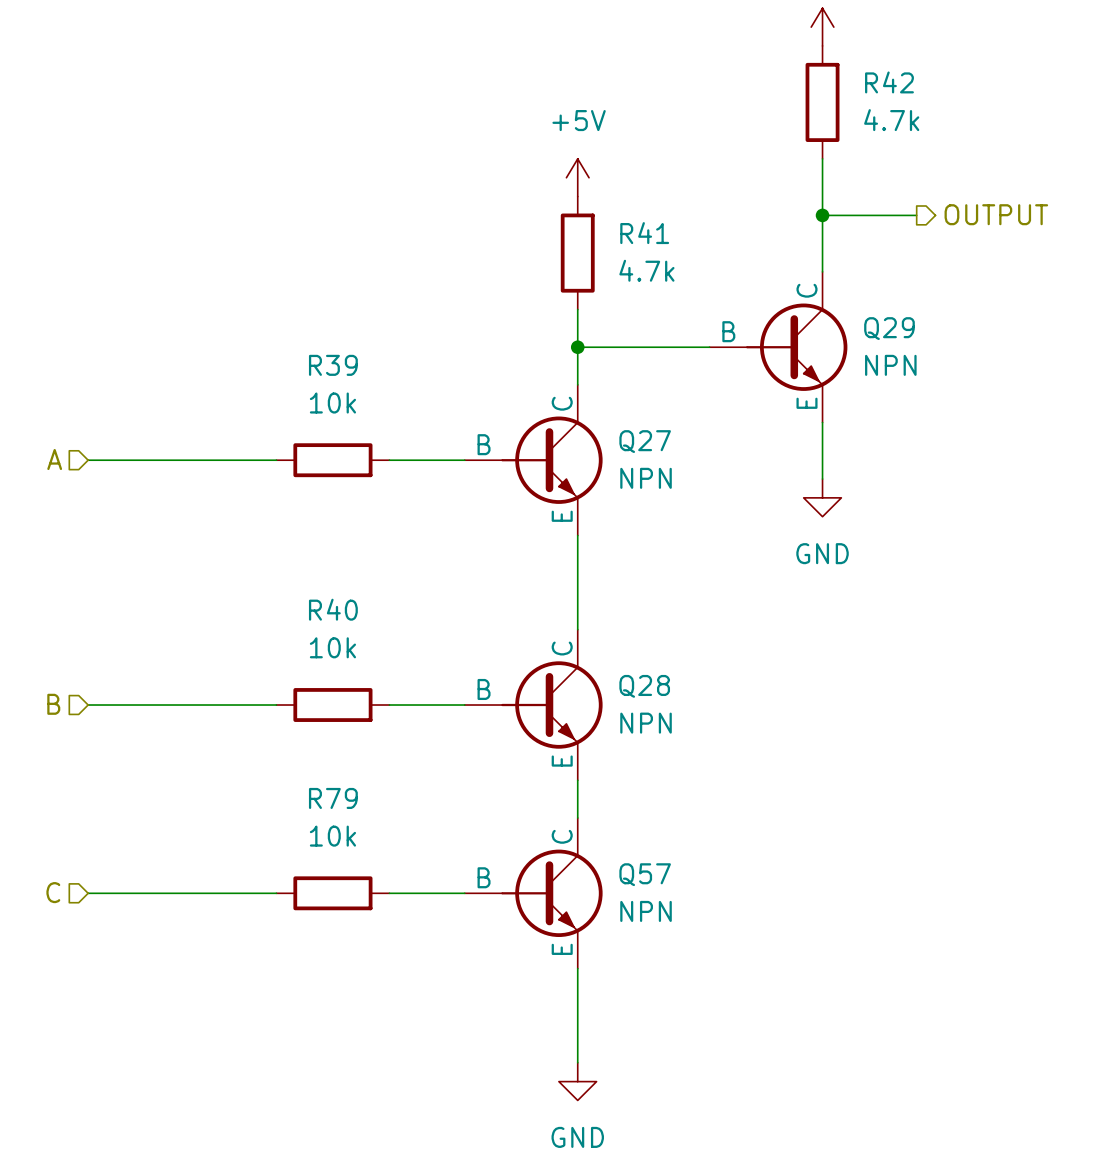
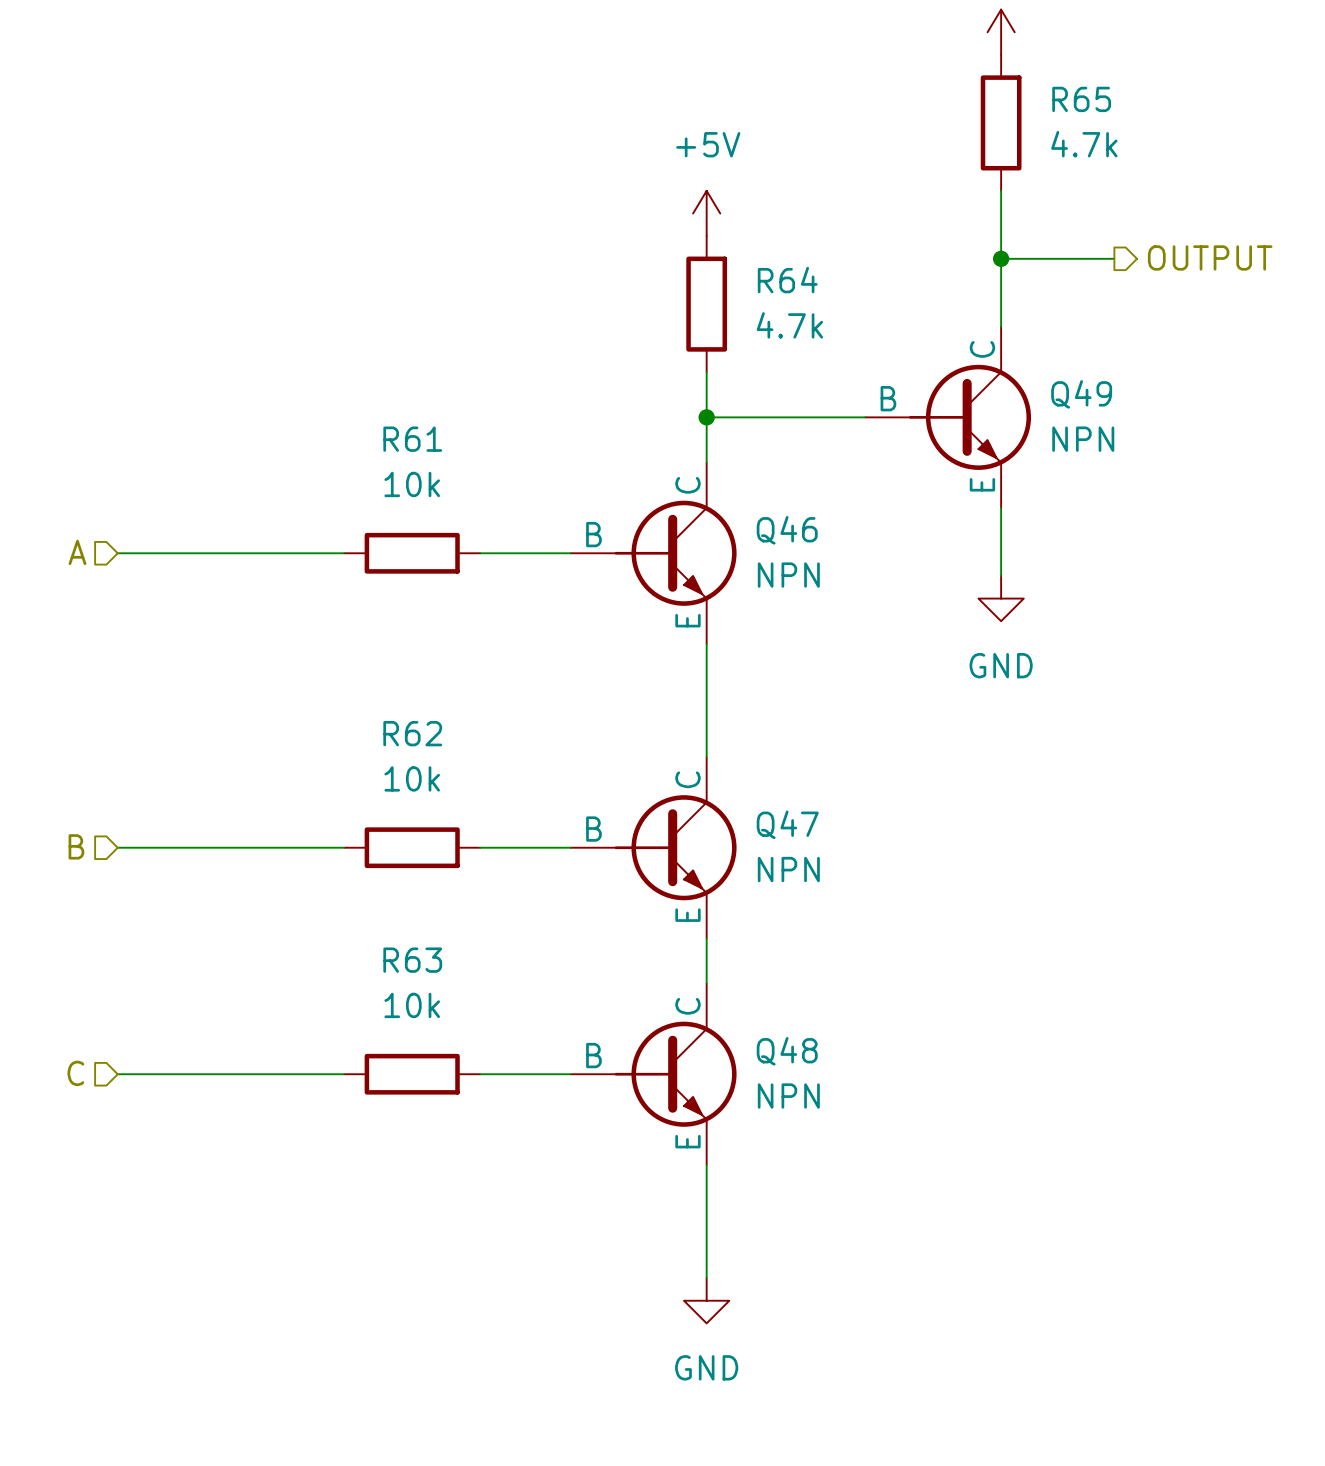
R42 name: R42 (889, 82) -> R65 (1081, 99)
R41 name: R41 (644, 233) -> R64 (787, 280)
Q29 name: Q29 (889, 328) -> Q49 (1081, 394)
R39 name: R39 (333, 365) -> R61 (412, 439)
Q27 name: Q27 (645, 441) -> Q46 (787, 530)
R40 name: R40 (333, 609) -> R62 (412, 733)
Q28 name: Q28 (644, 686) -> Q47 (787, 824)
R79 name: R79 (333, 798) -> R63 (412, 960)
Q57 name: Q57 (645, 874) -> Q48 (787, 1051)

